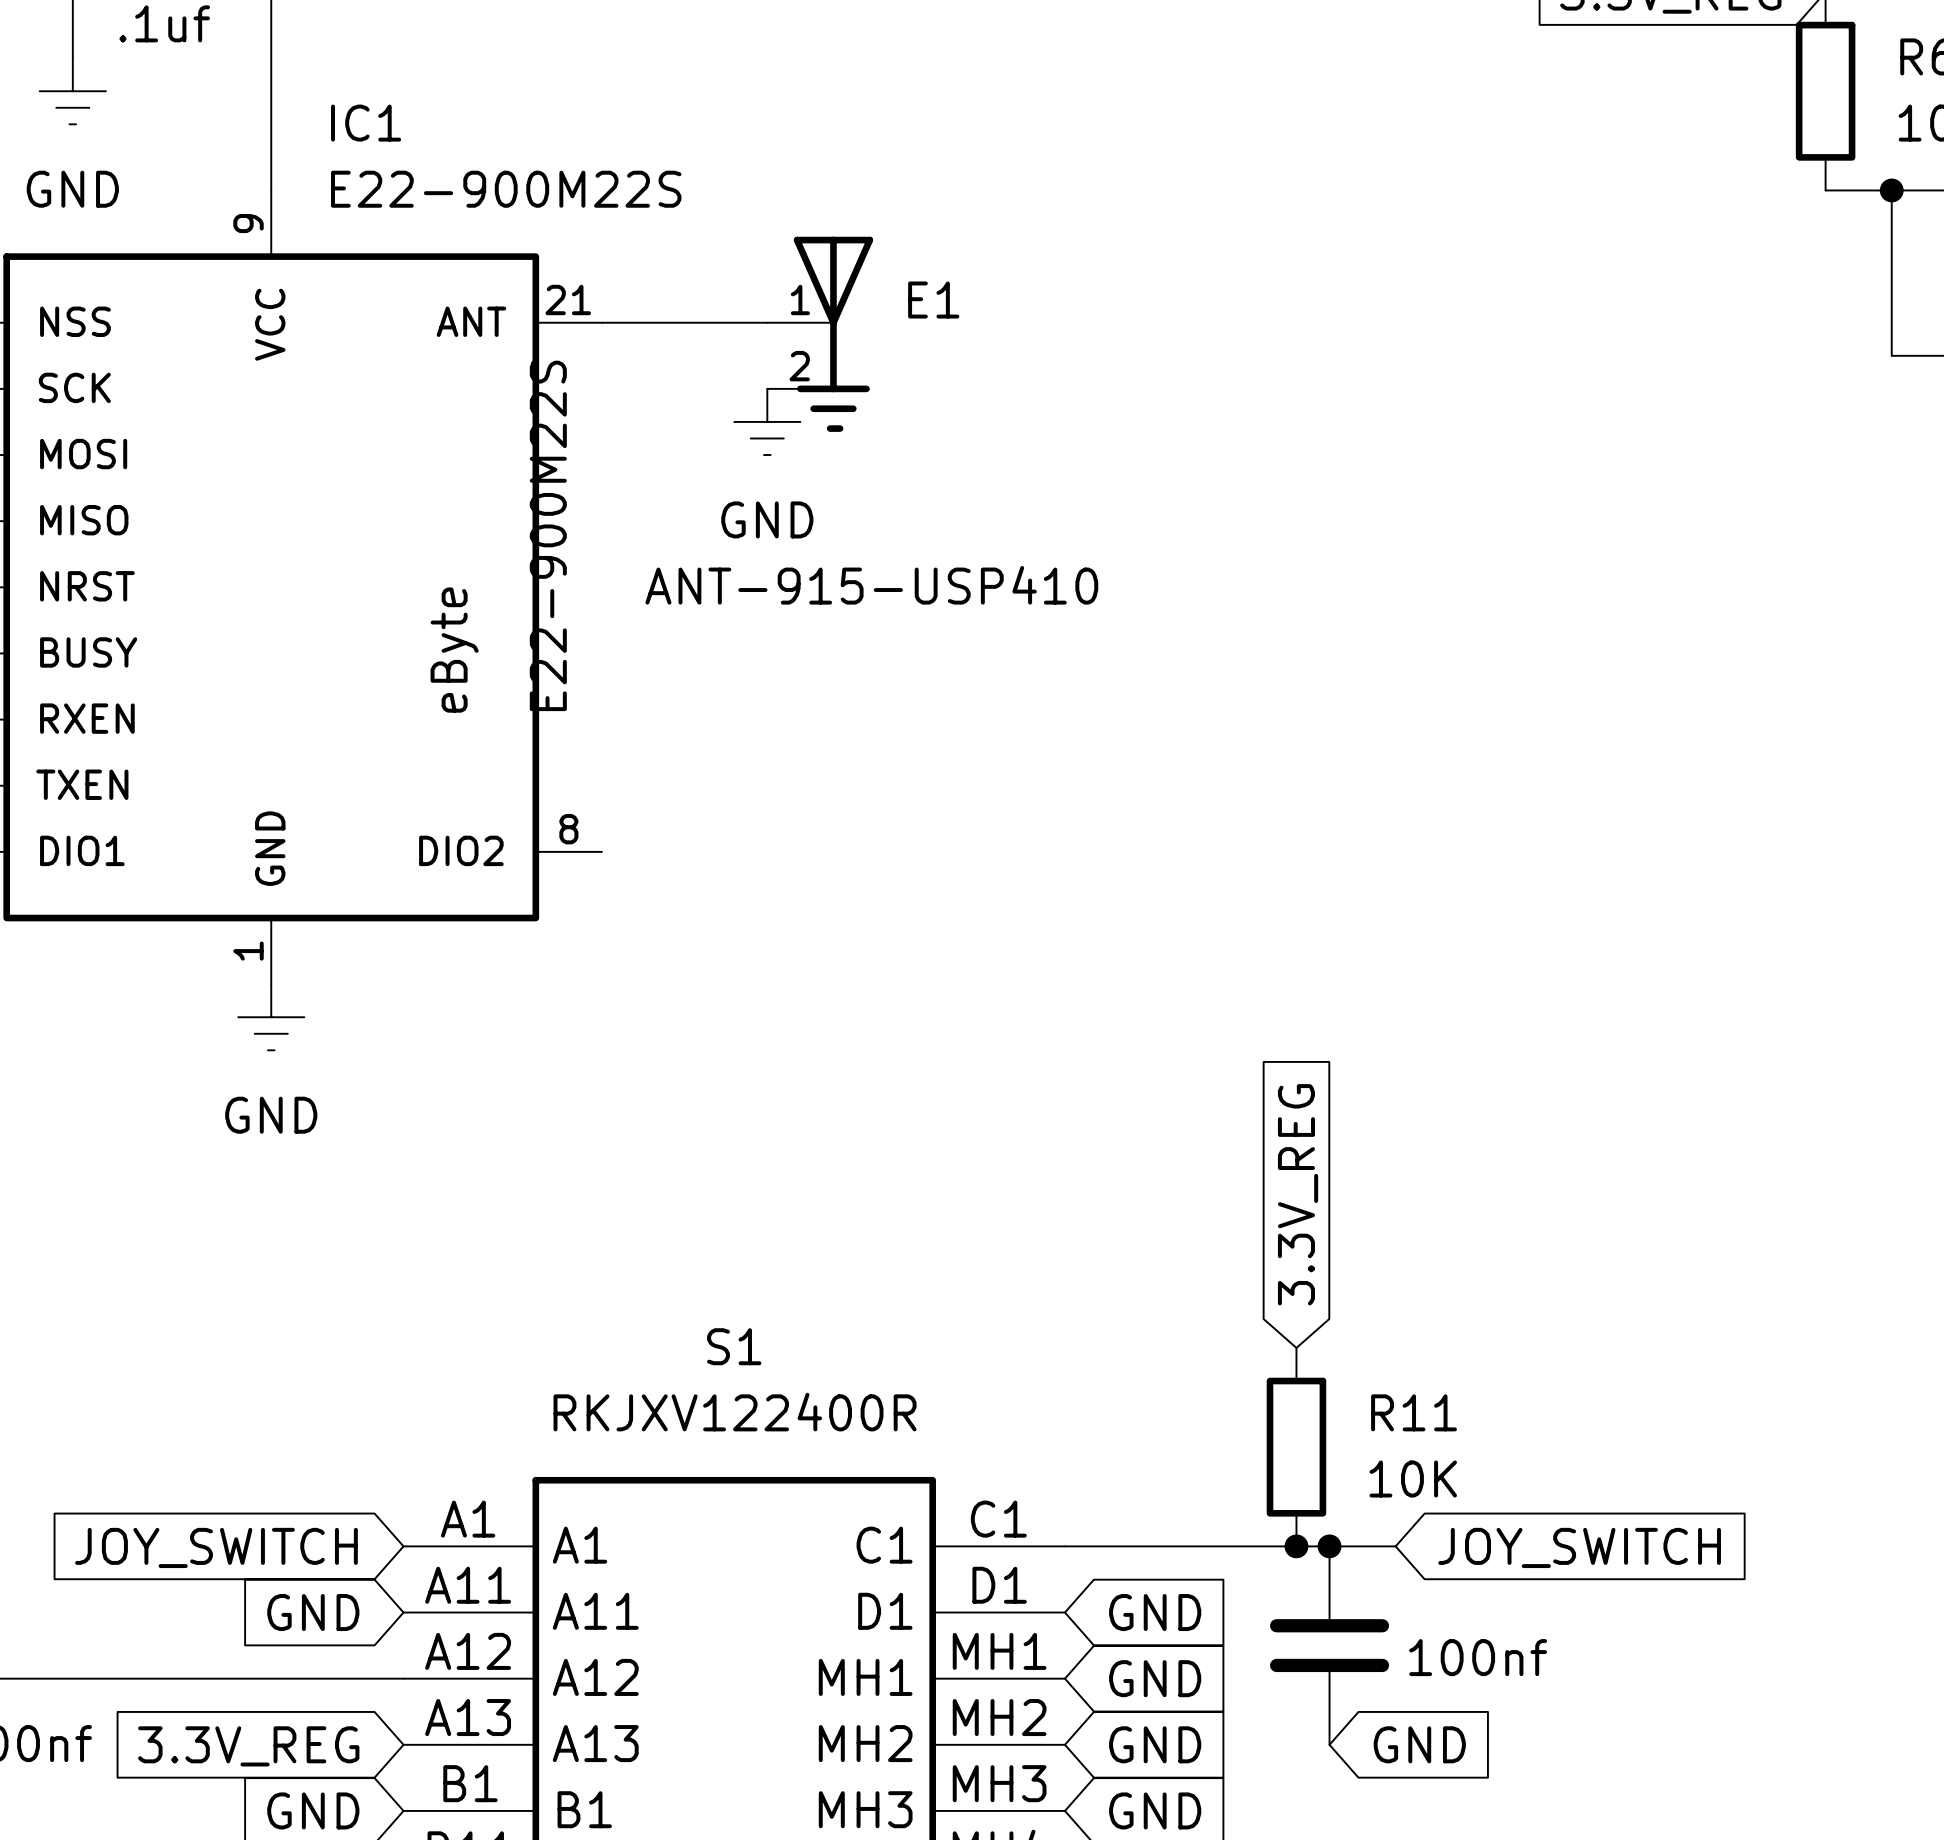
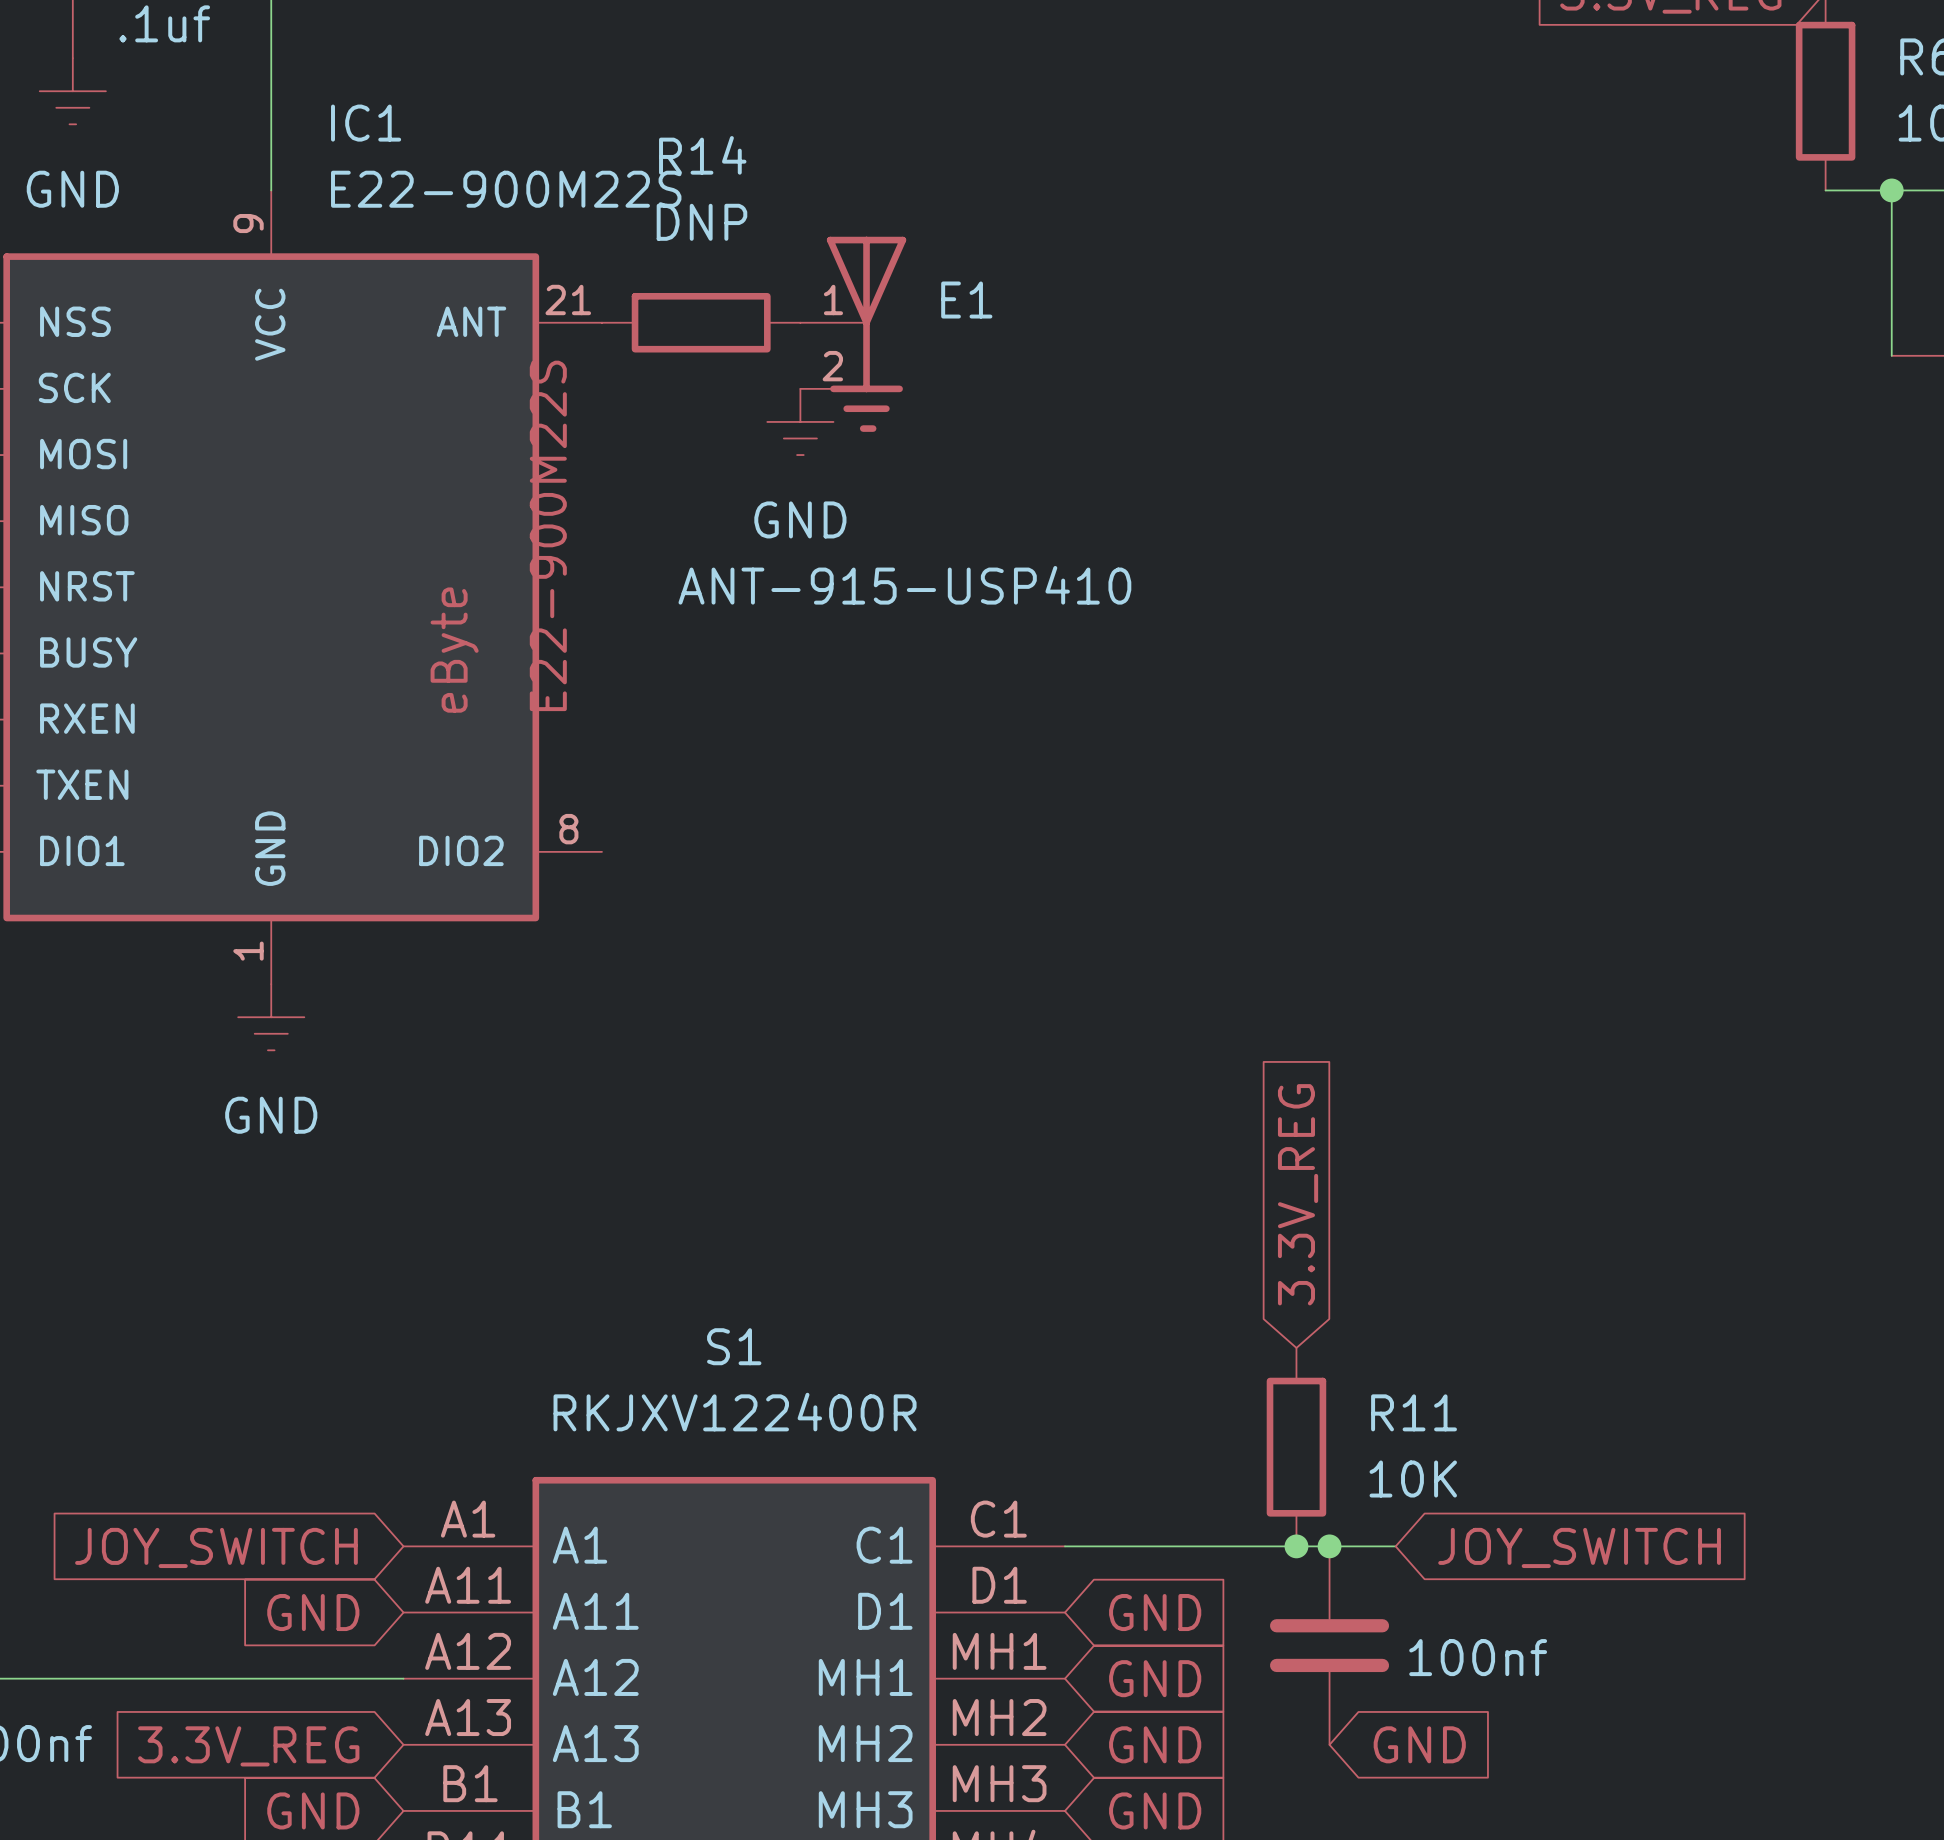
wire: (601, 322) (767, 322) -> none
R14: none -> DNP (701, 322)
E1 position: (820, 334) -> (853, 334)
power symbol position: GND (767, 421) -> GND (800, 421)

